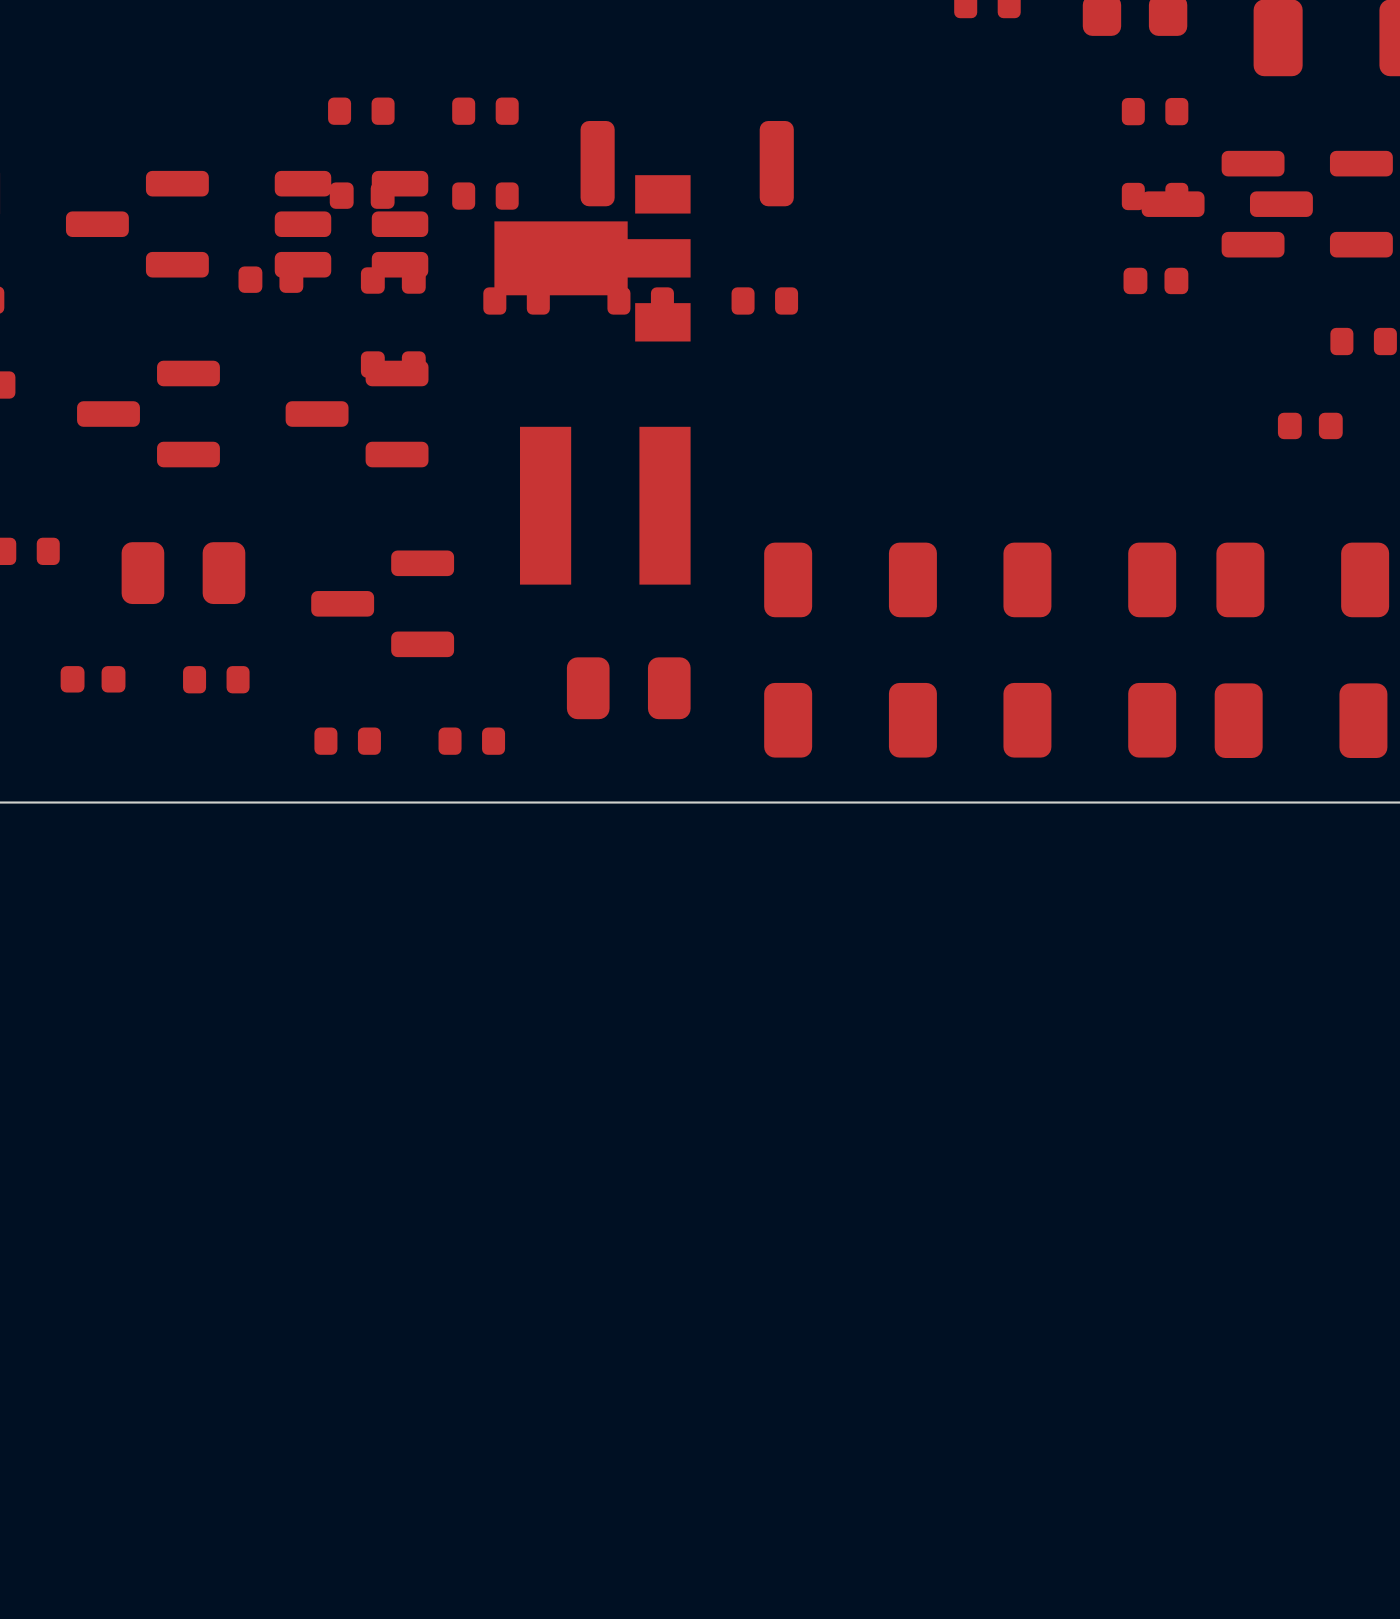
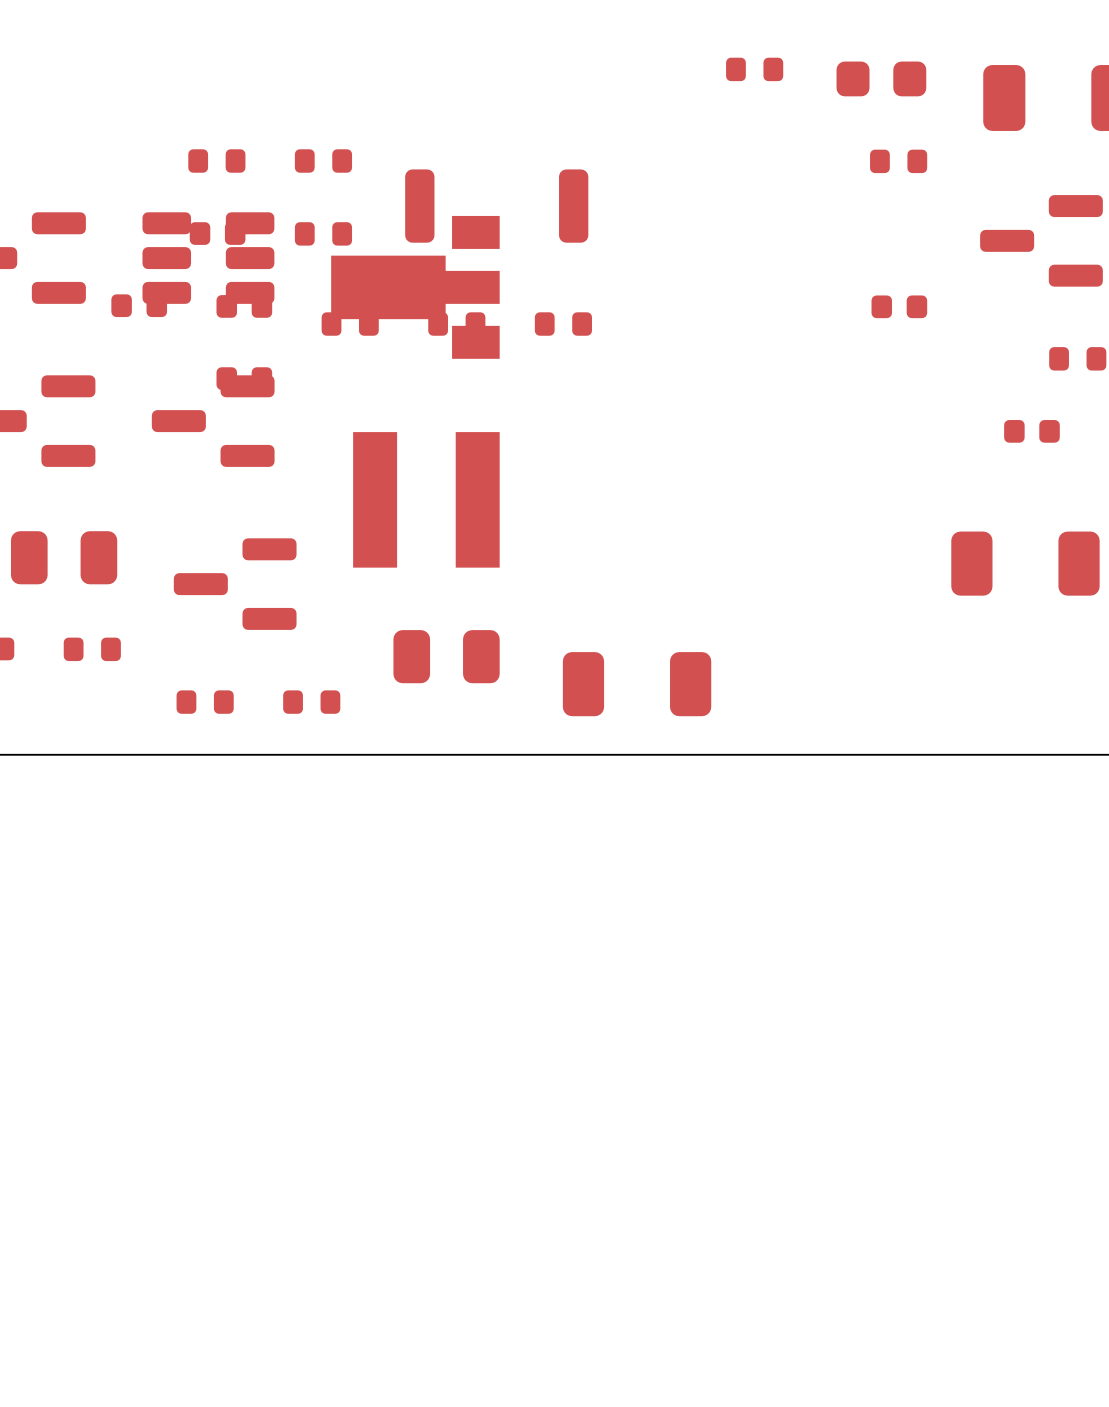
part: (1155, 196) -> none
part: (1213, 204) -> none
part: (850, 579) -> none
part: (1089, 579) -> none
part: (1089, 720) -> none
part: (1301, 720) -> none

